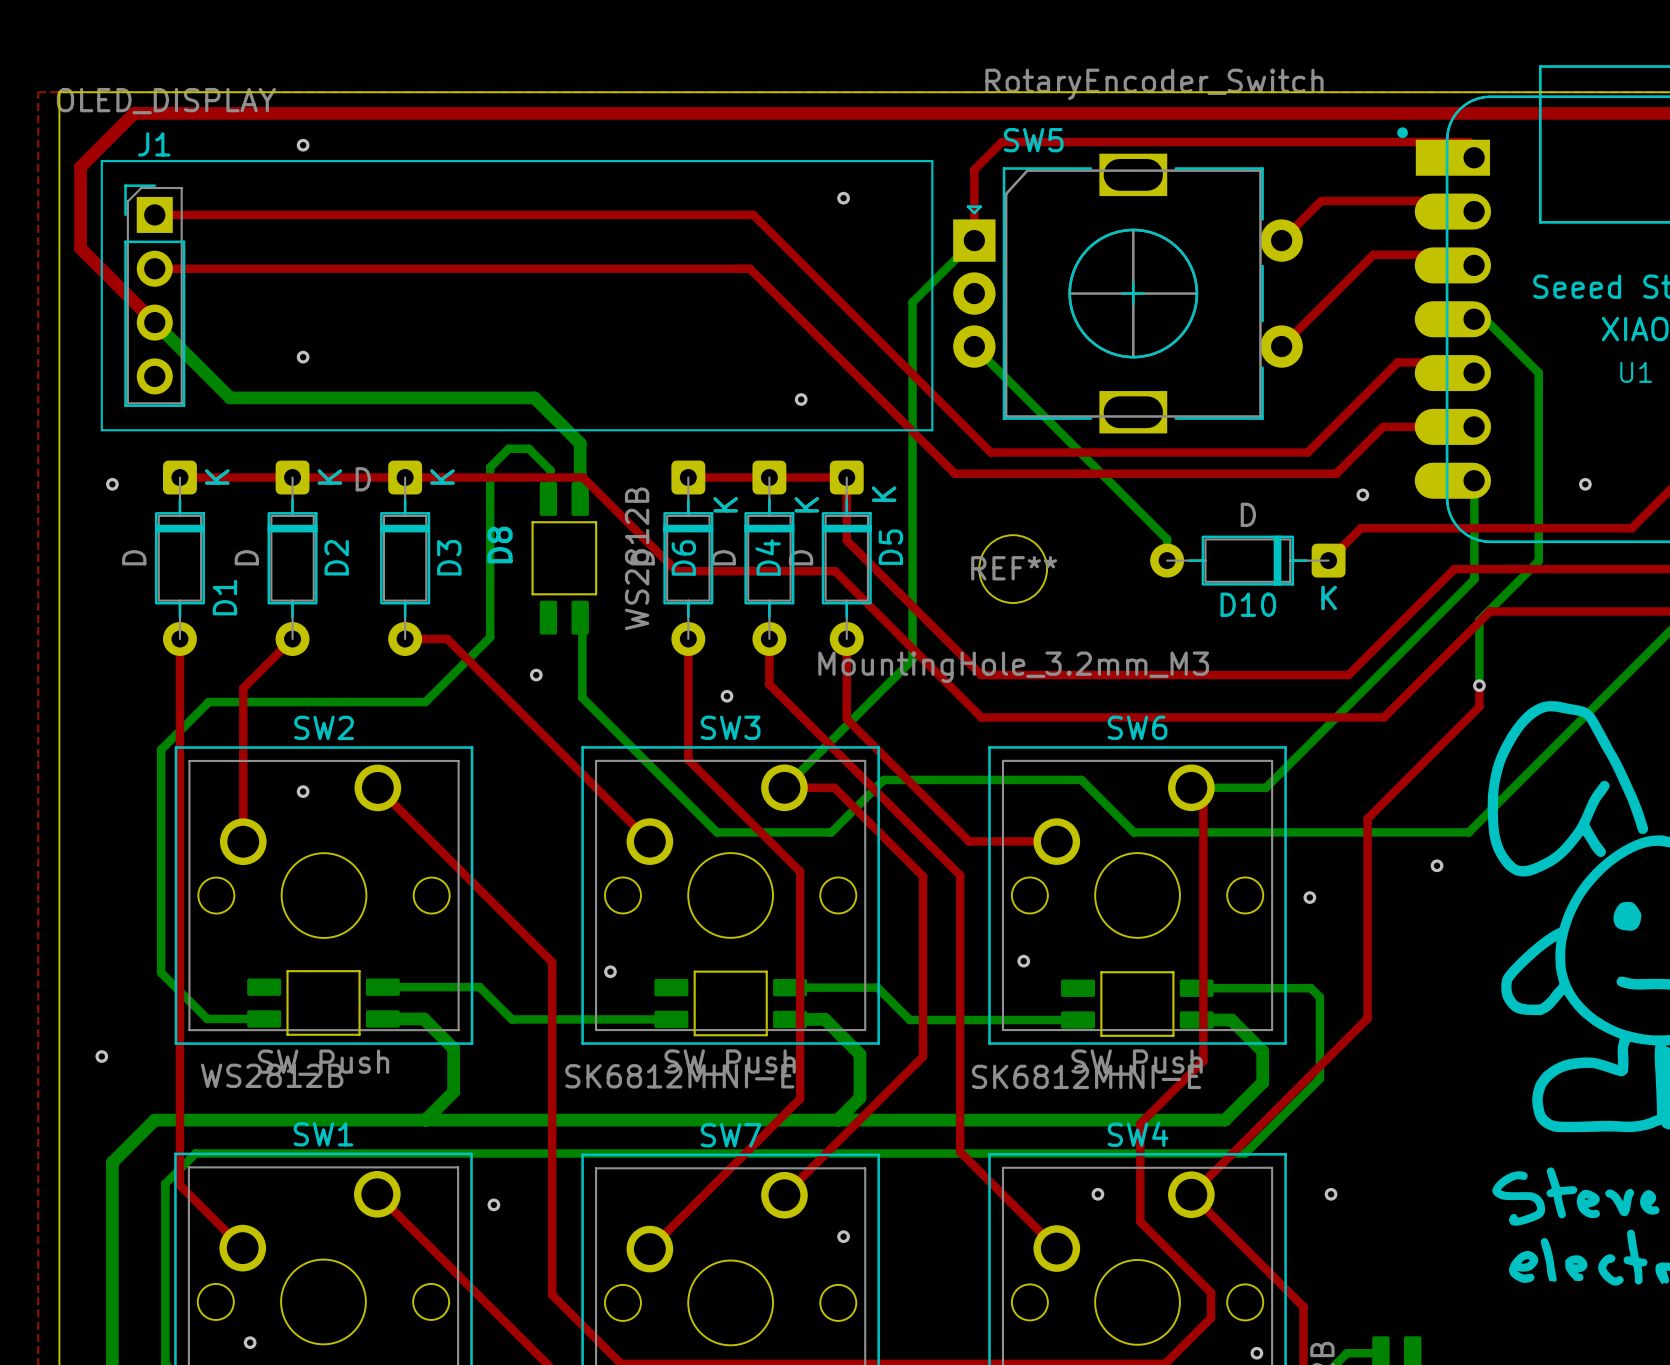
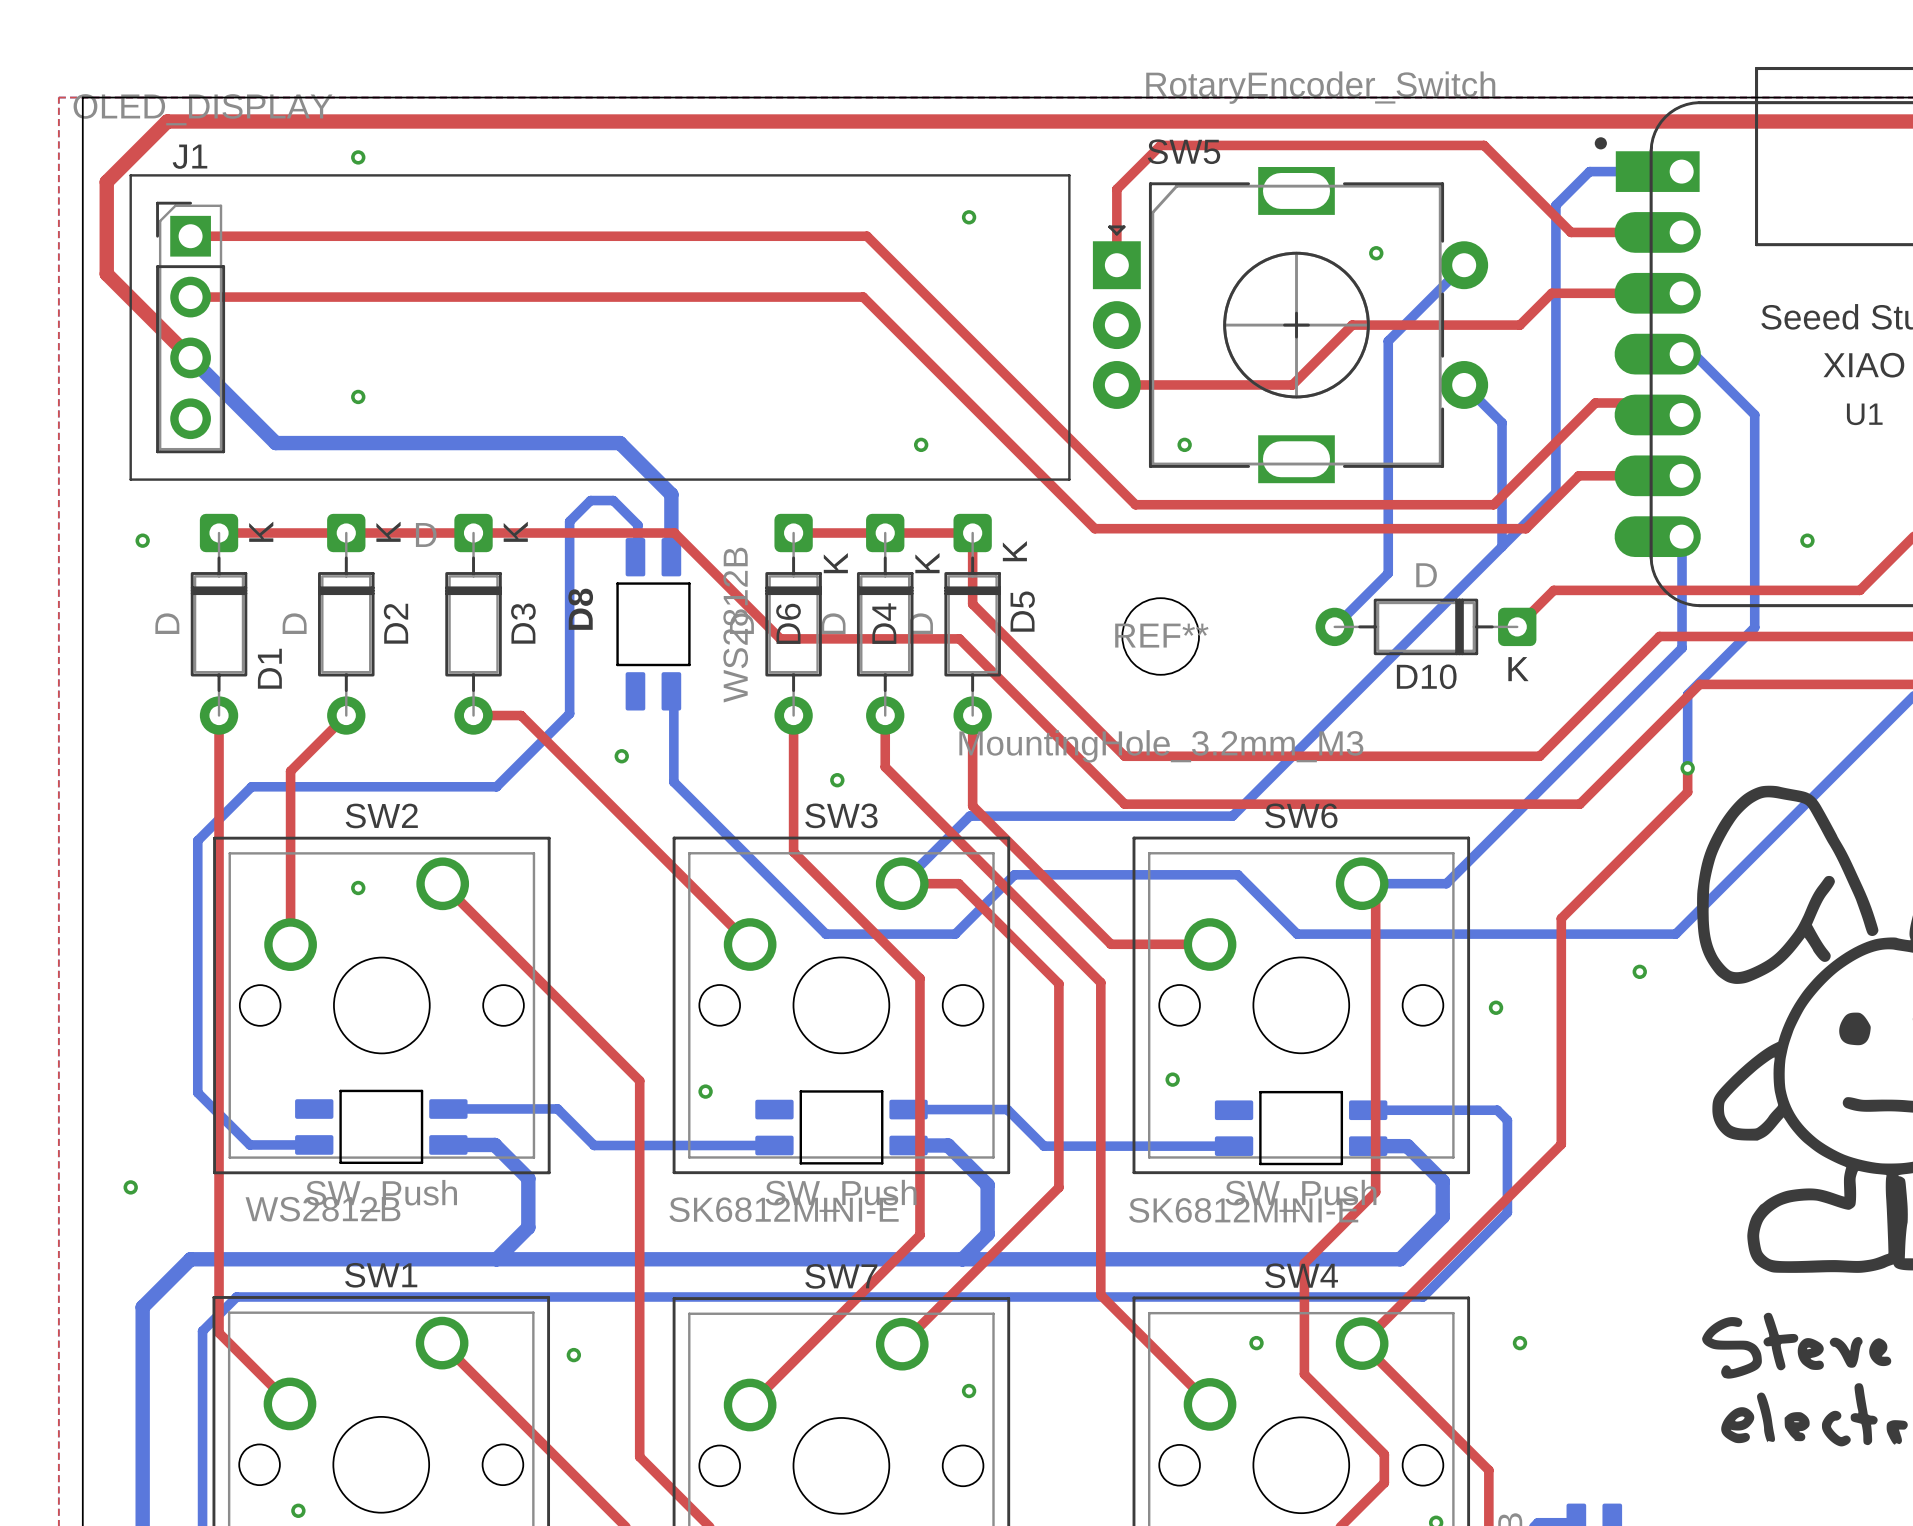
top track: (1474, 157) (1474, 146) (1469, 142) (1002, 142) (974, 169) (974, 173) -> (1681, 232) (1571, 232) (1484, 145) (1160, 145) (1116, 189)
top track: (1474, 211) (1463, 200) (1321, 200) (1281, 240) -> none
via: none -> (1376, 253)
bottom track: (974, 240) (912, 302) (912, 659) (844, 728) -> (1681, 171) (1589, 171) (1555, 205) (1555, 492) (1232, 816) (969, 816)
top track: (1474, 265) (1463, 254) (1373, 254) (1281, 346) -> (1681, 293) (1551, 293) (1519, 325) (1352, 325) (1292, 384) (1116, 384)
bottom track: (974, 346) (1167, 539) (1167, 560) -> (1464, 265) (1388, 341) (1388, 573) (1334, 626)
bottom track: none -> (1464, 384) (1502, 422) (1502, 546)
via: none -> (1184, 444)
via: (1362, 494) -> none

